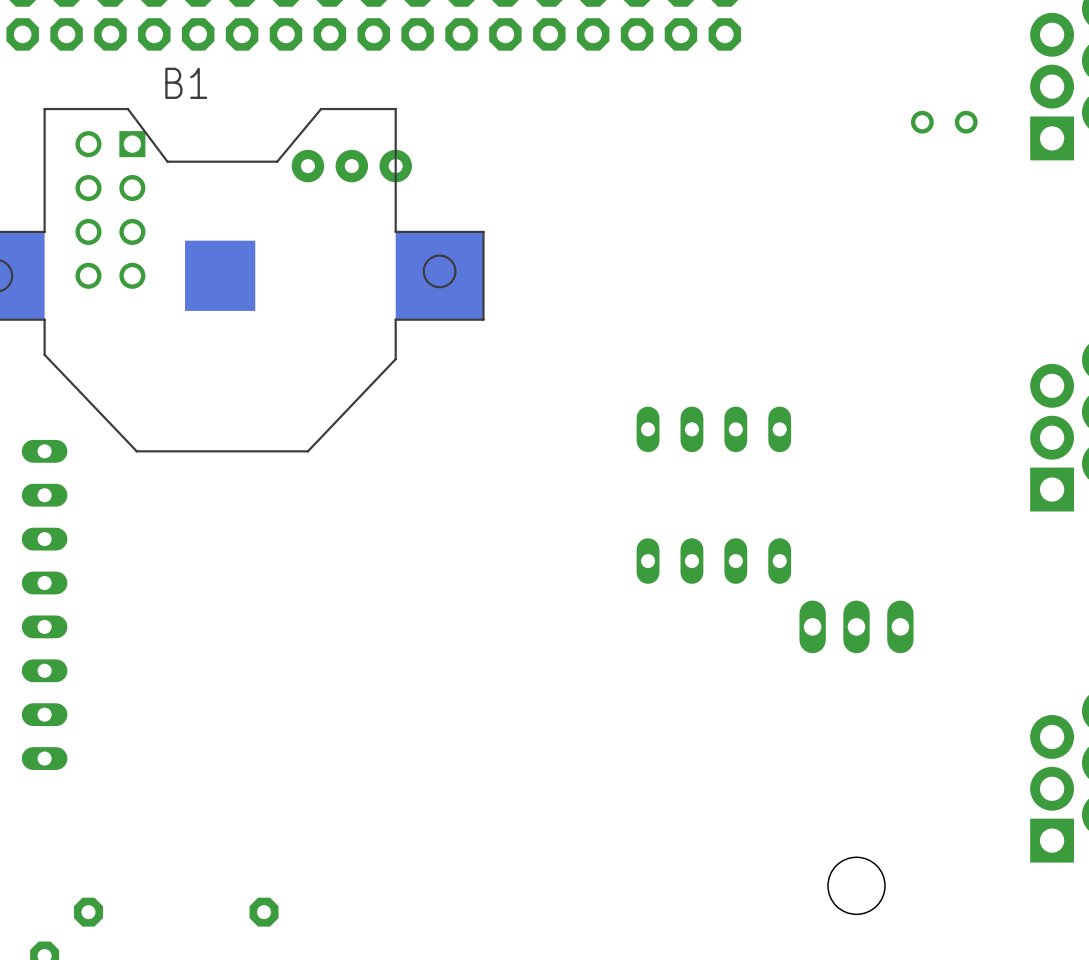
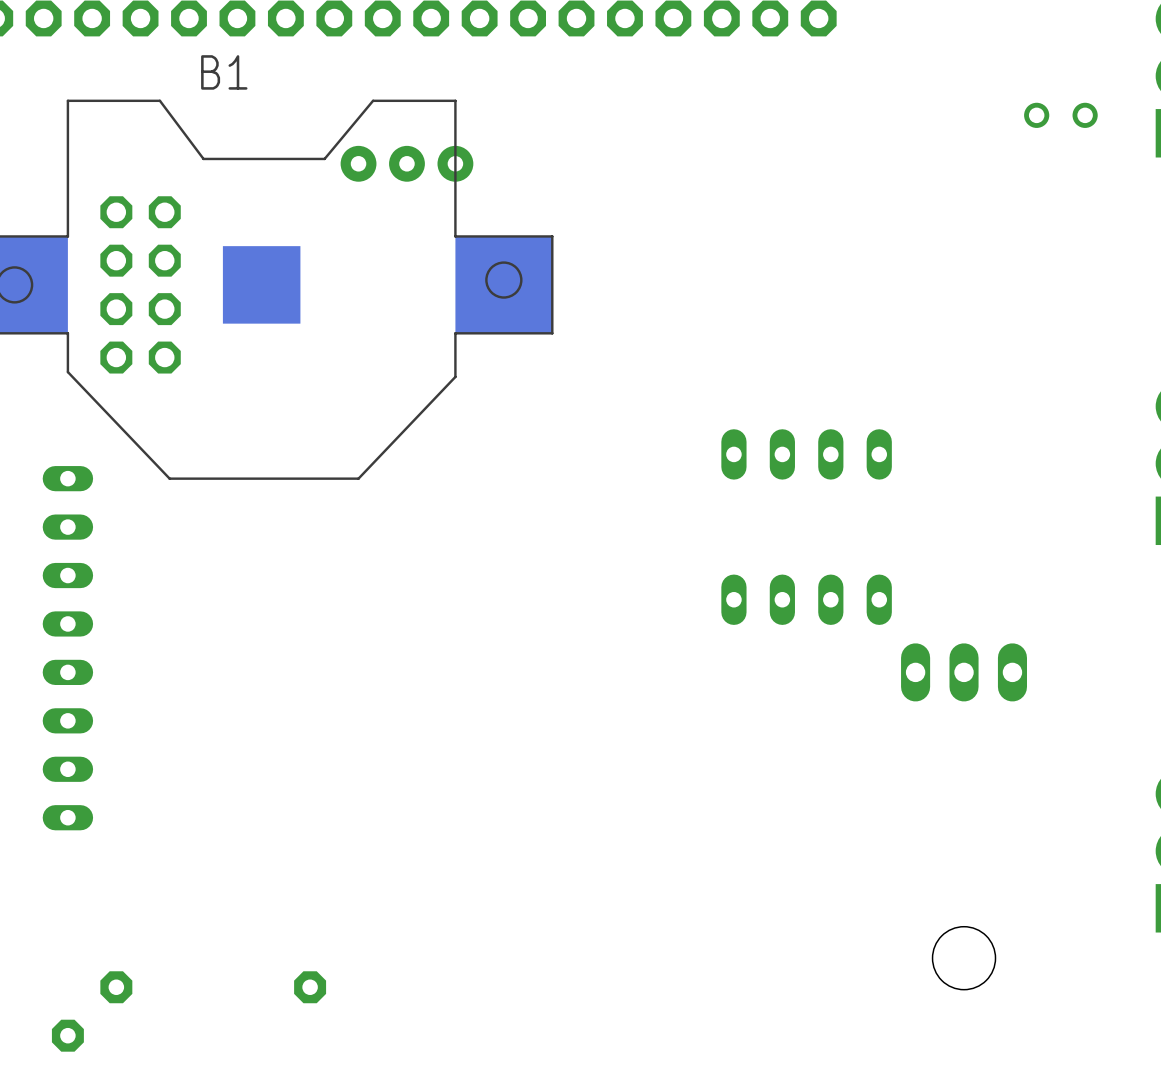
part: (110, 209) -> none
part: none -> (140, 284)

